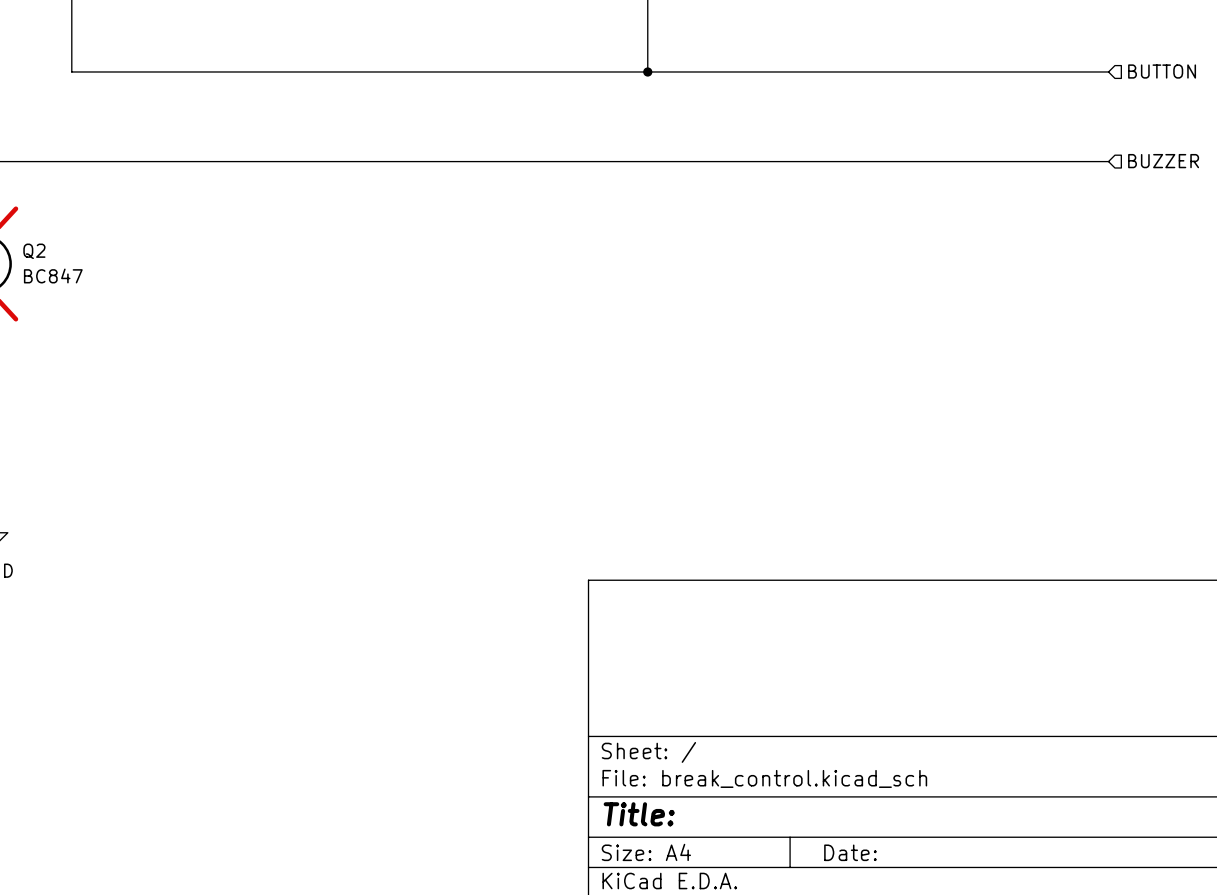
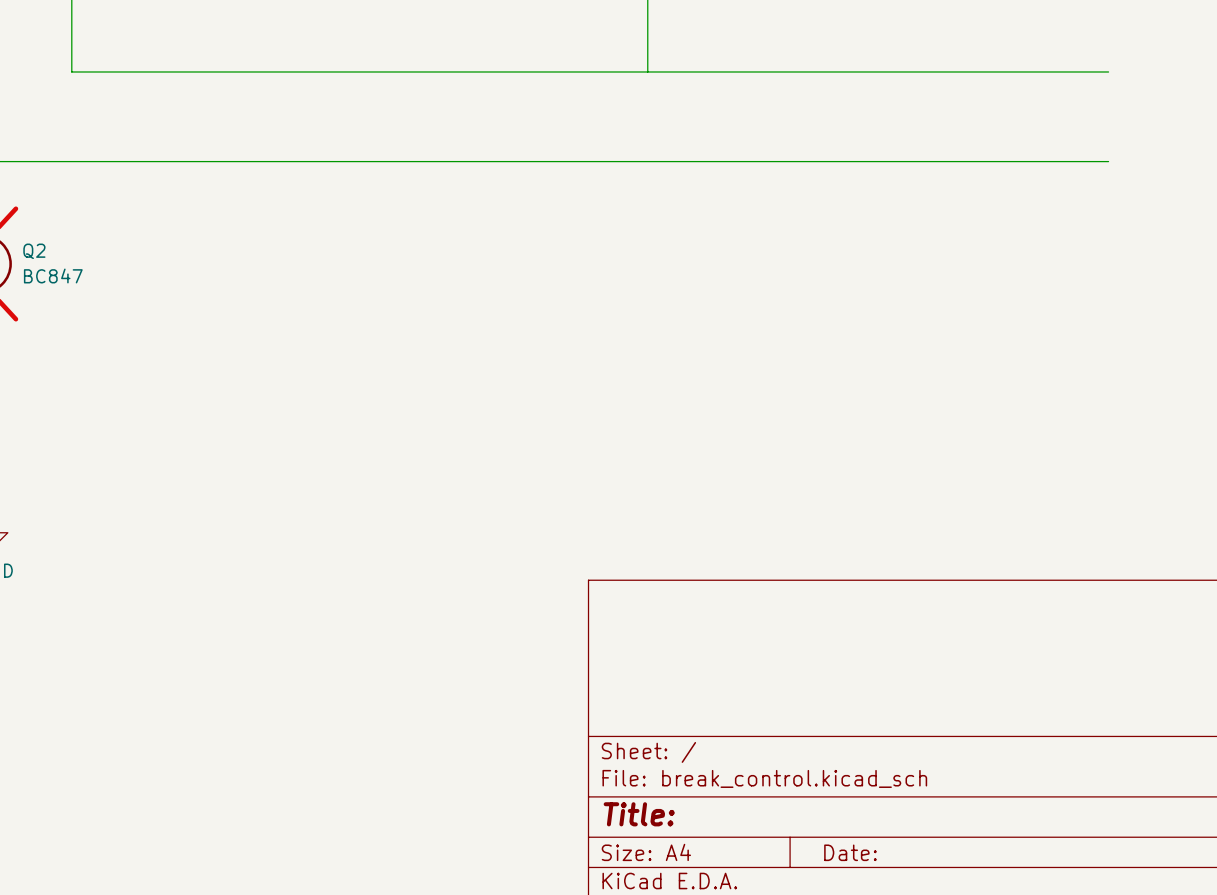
junction: (647, 71) -> none
hierarchical label: BUTTON (1162, 71) -> none
hierarchical label: BUZZER (1163, 161) -> none

